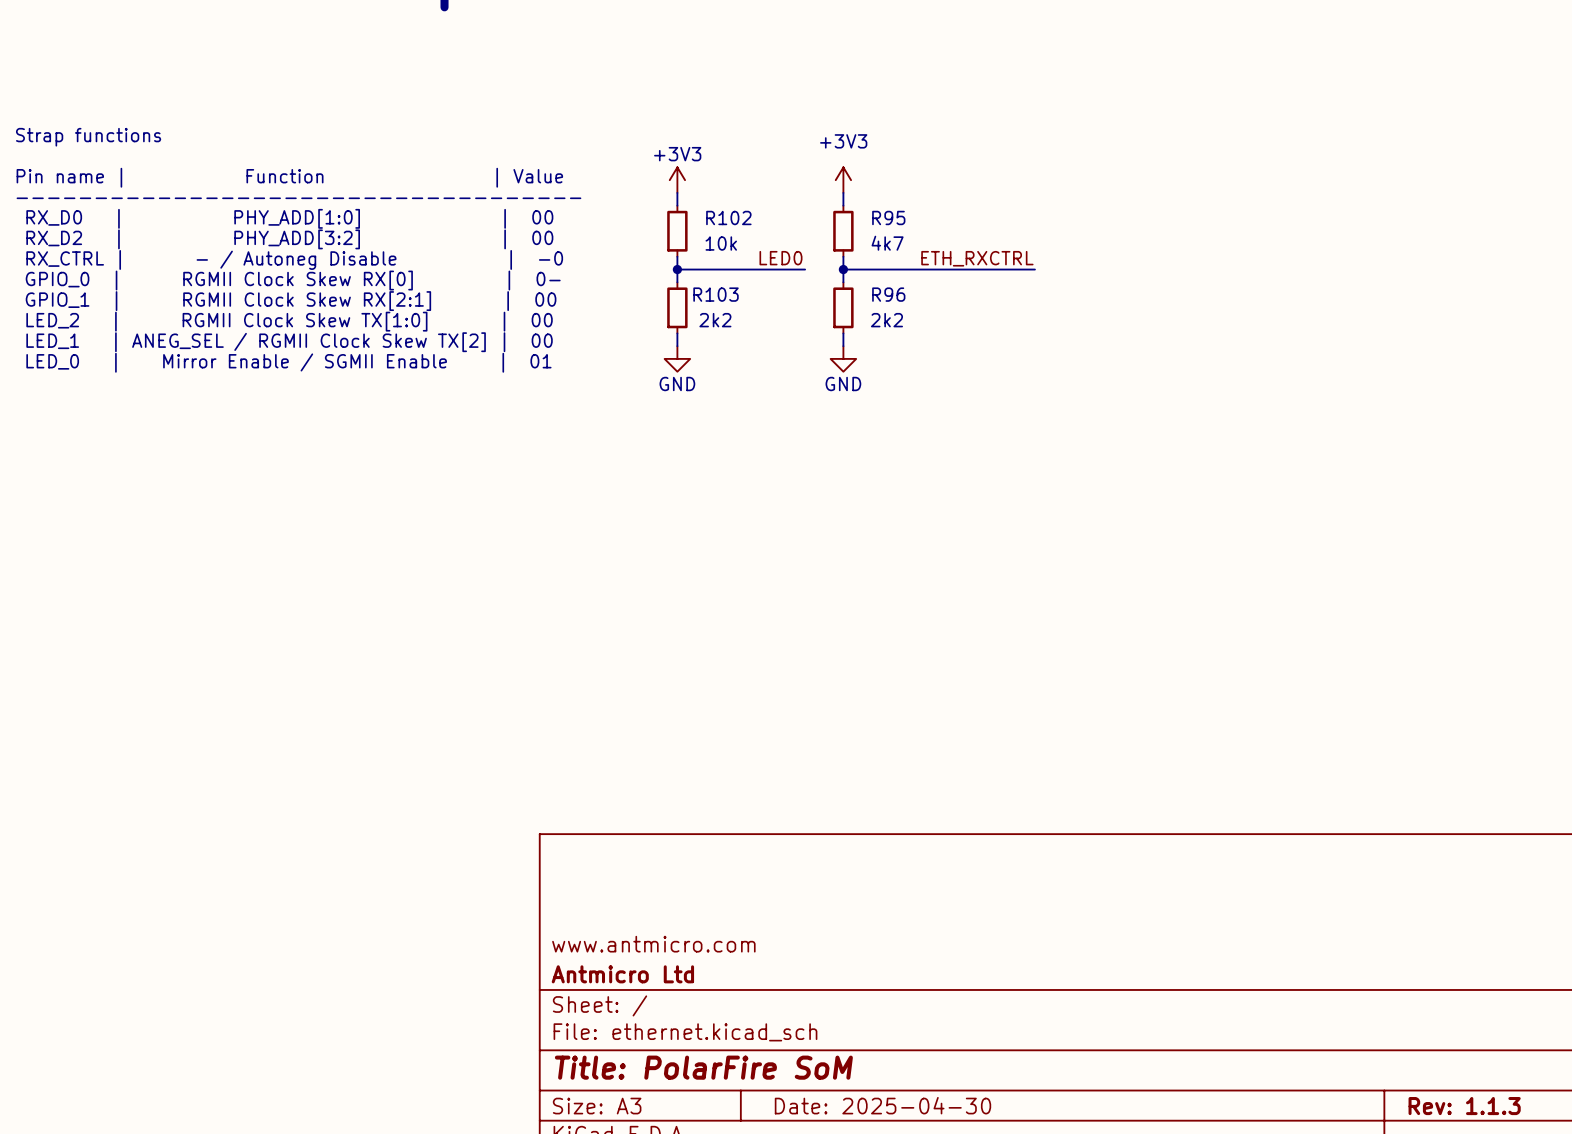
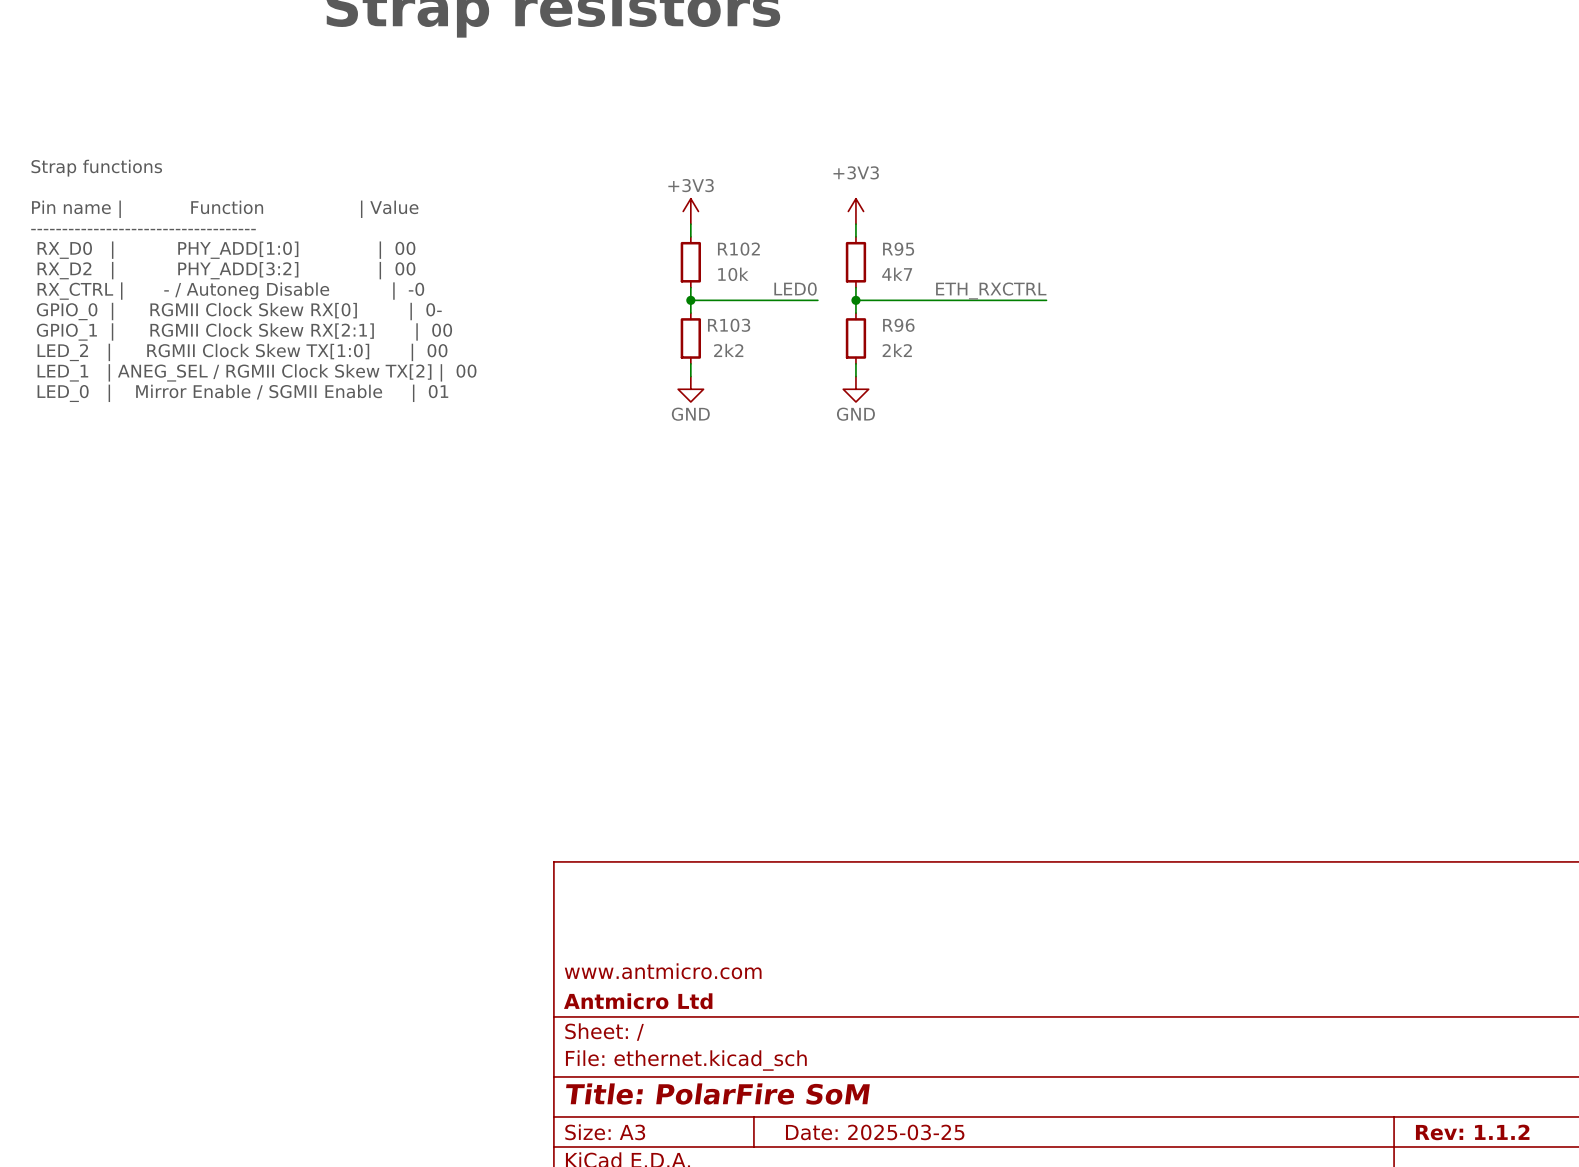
title block: Date: 2025-04-30 (882, 1105) -> Date: 2025-03-25 (875, 1132)
title block: Rev: 1.1.3 (1464, 1106) -> Rev: 1.1.2 (1472, 1132)

